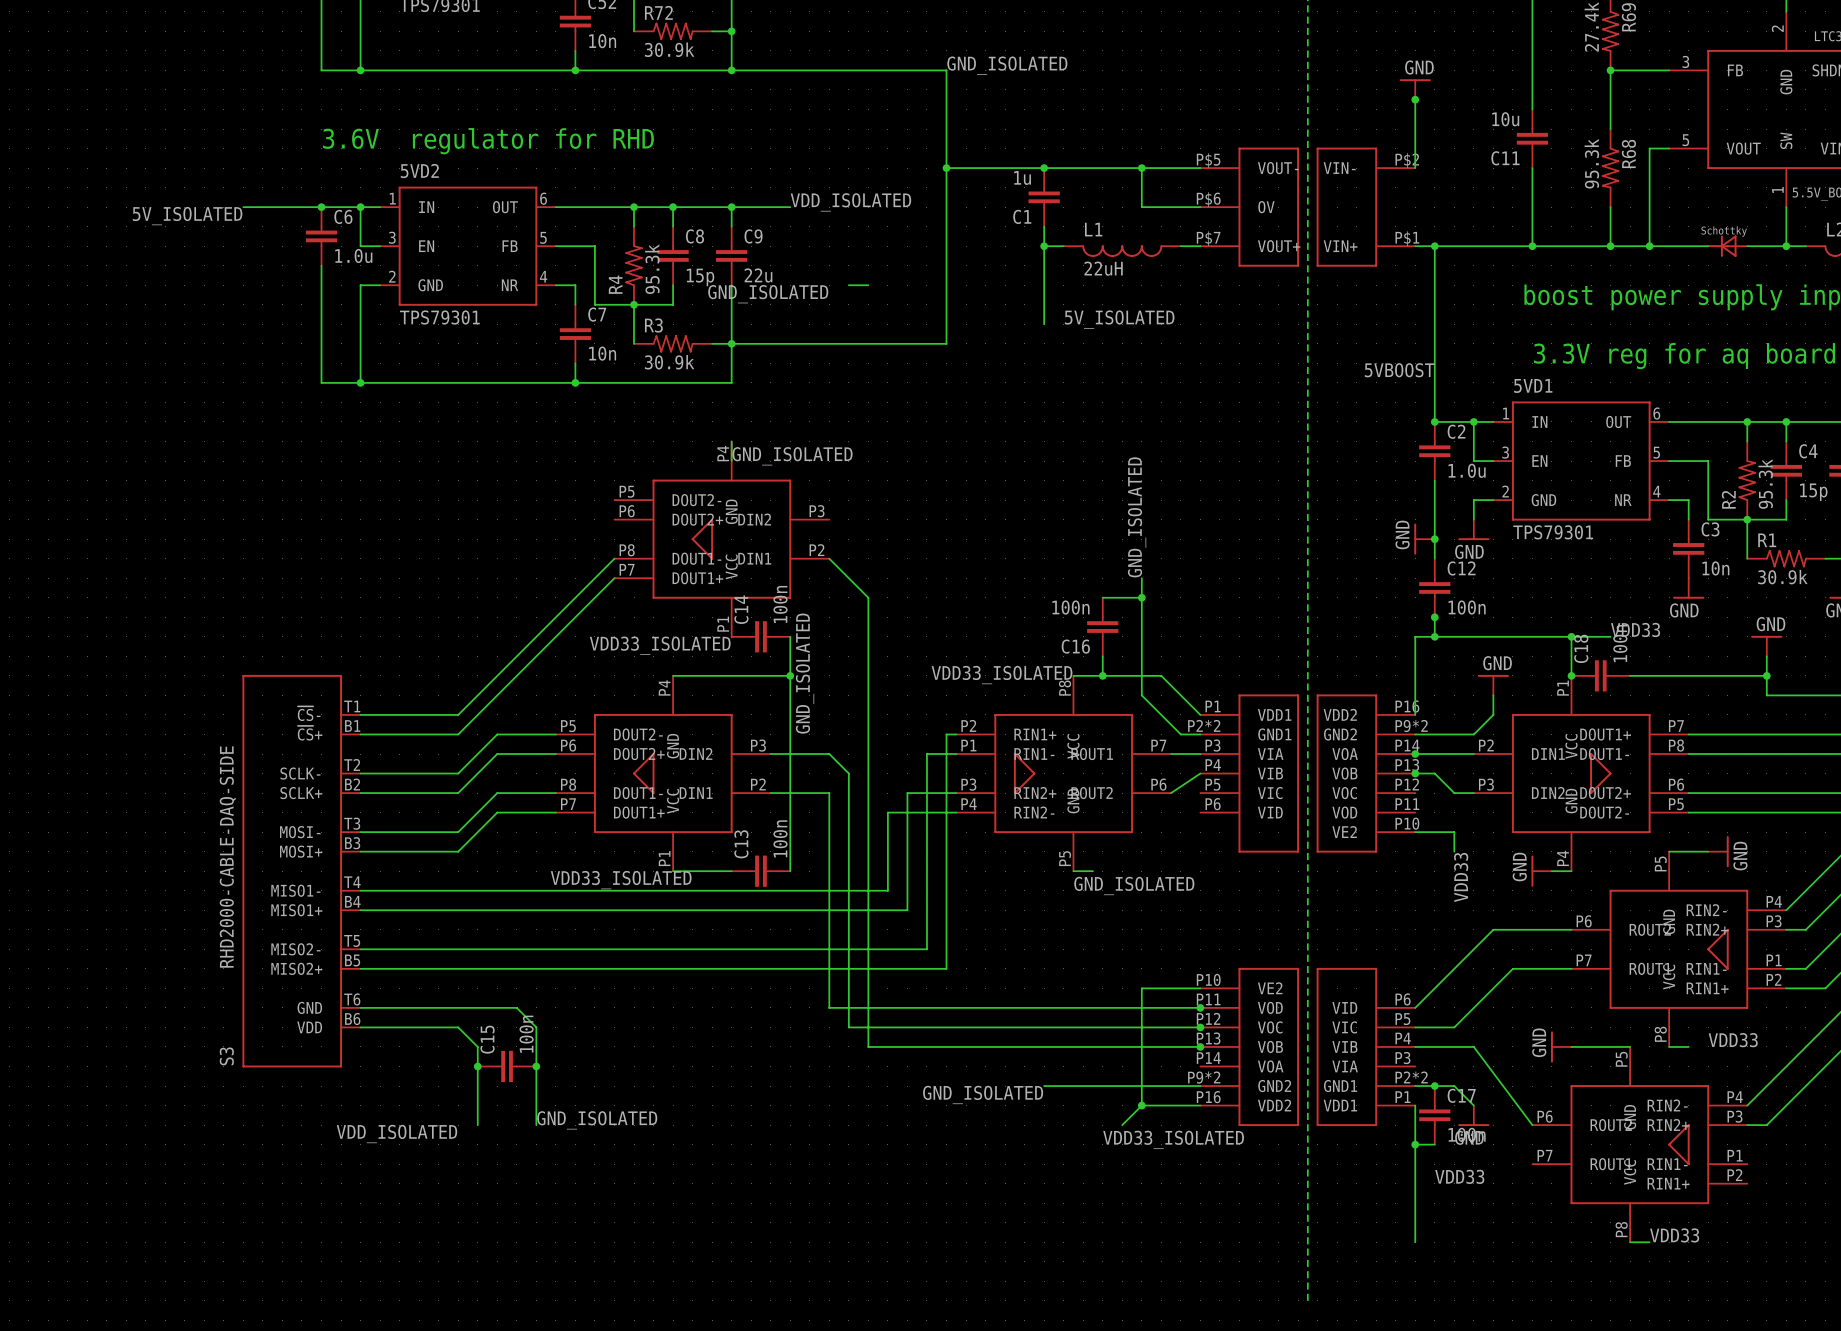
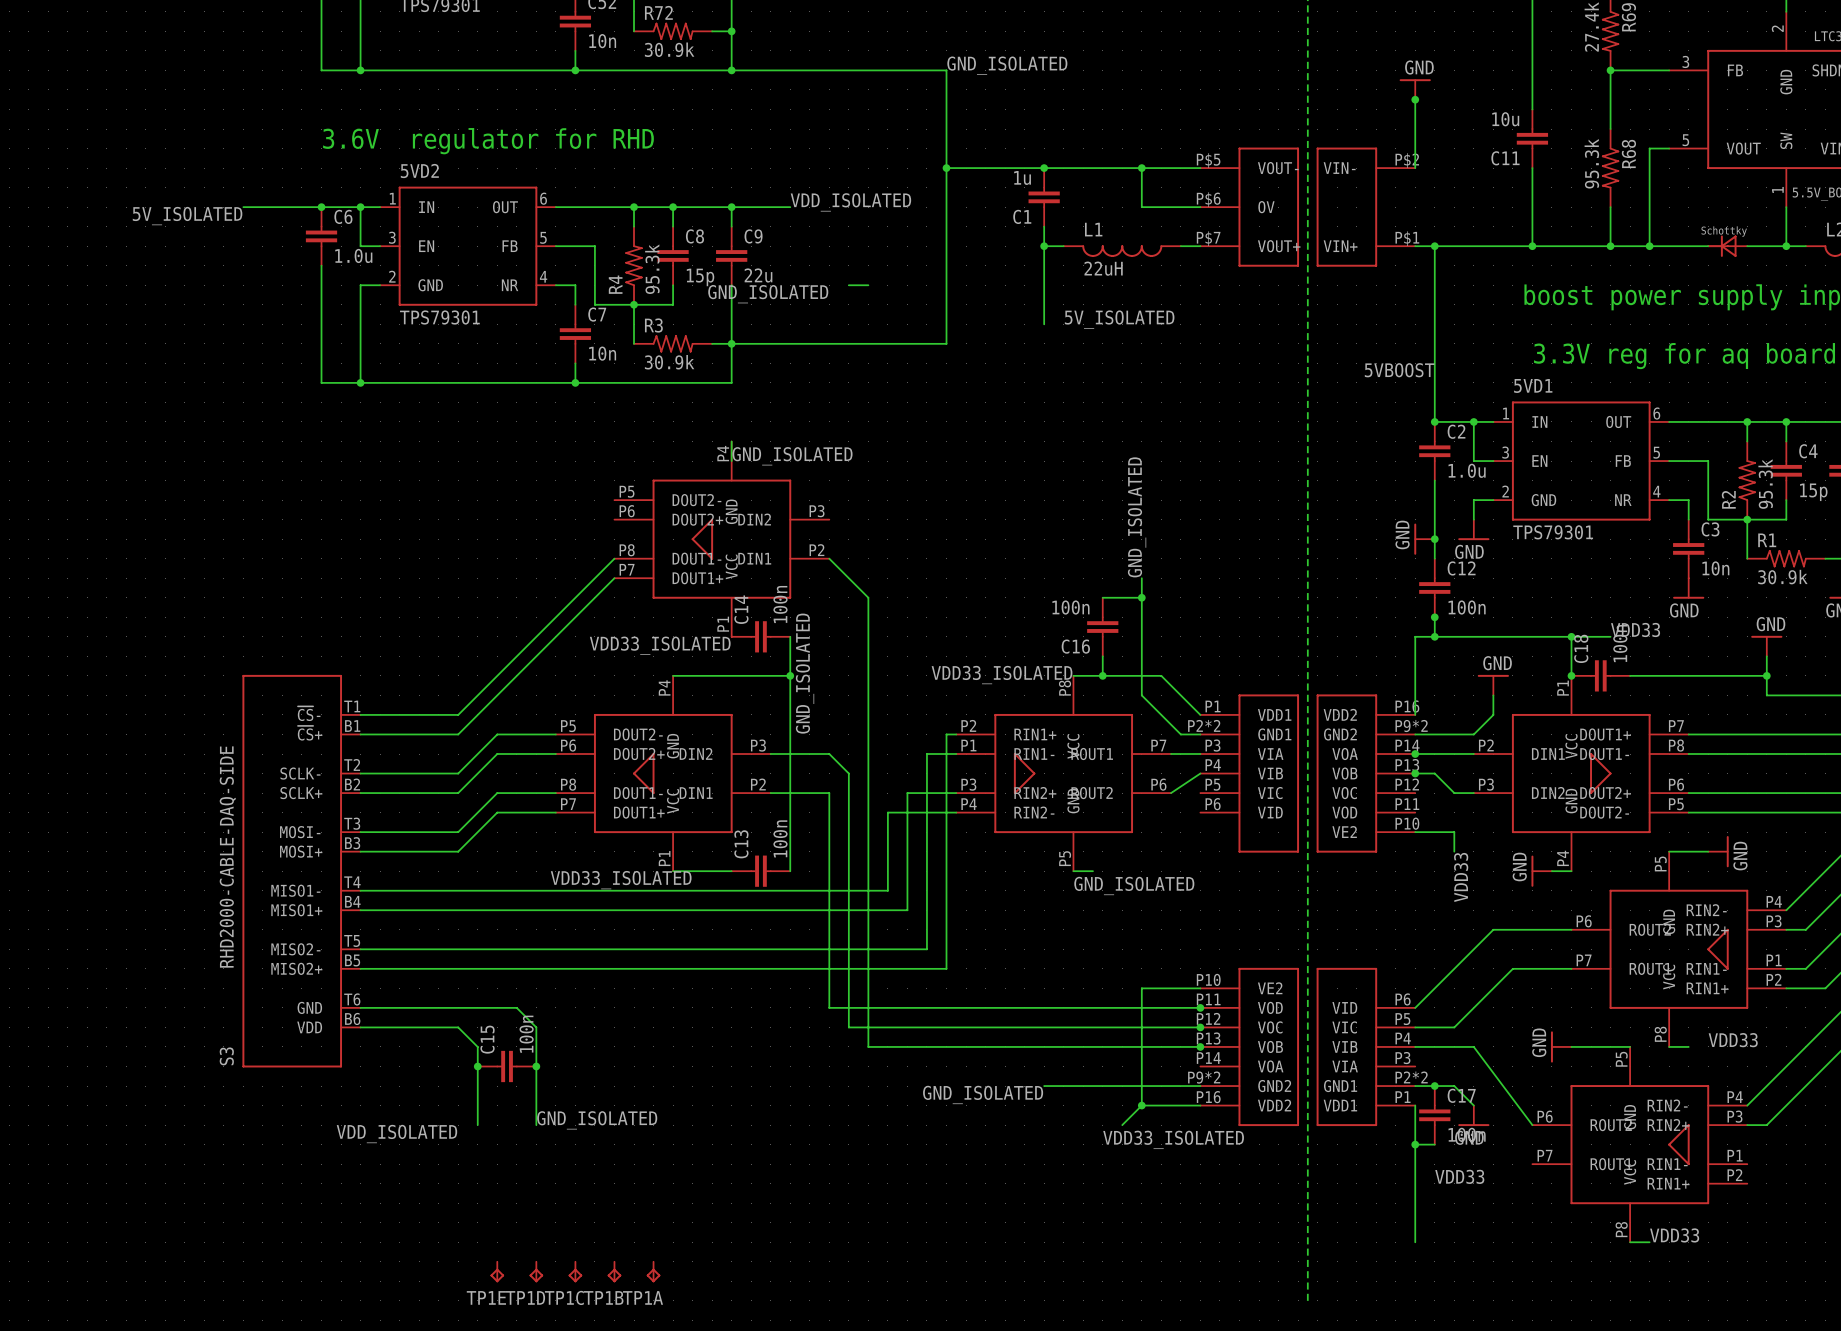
TP1E: none -> (497, 1272)
TP1D: none -> (536, 1272)
TP1C: none -> (575, 1272)
TP1B: none -> (614, 1272)
TP1A: none -> (653, 1272)

